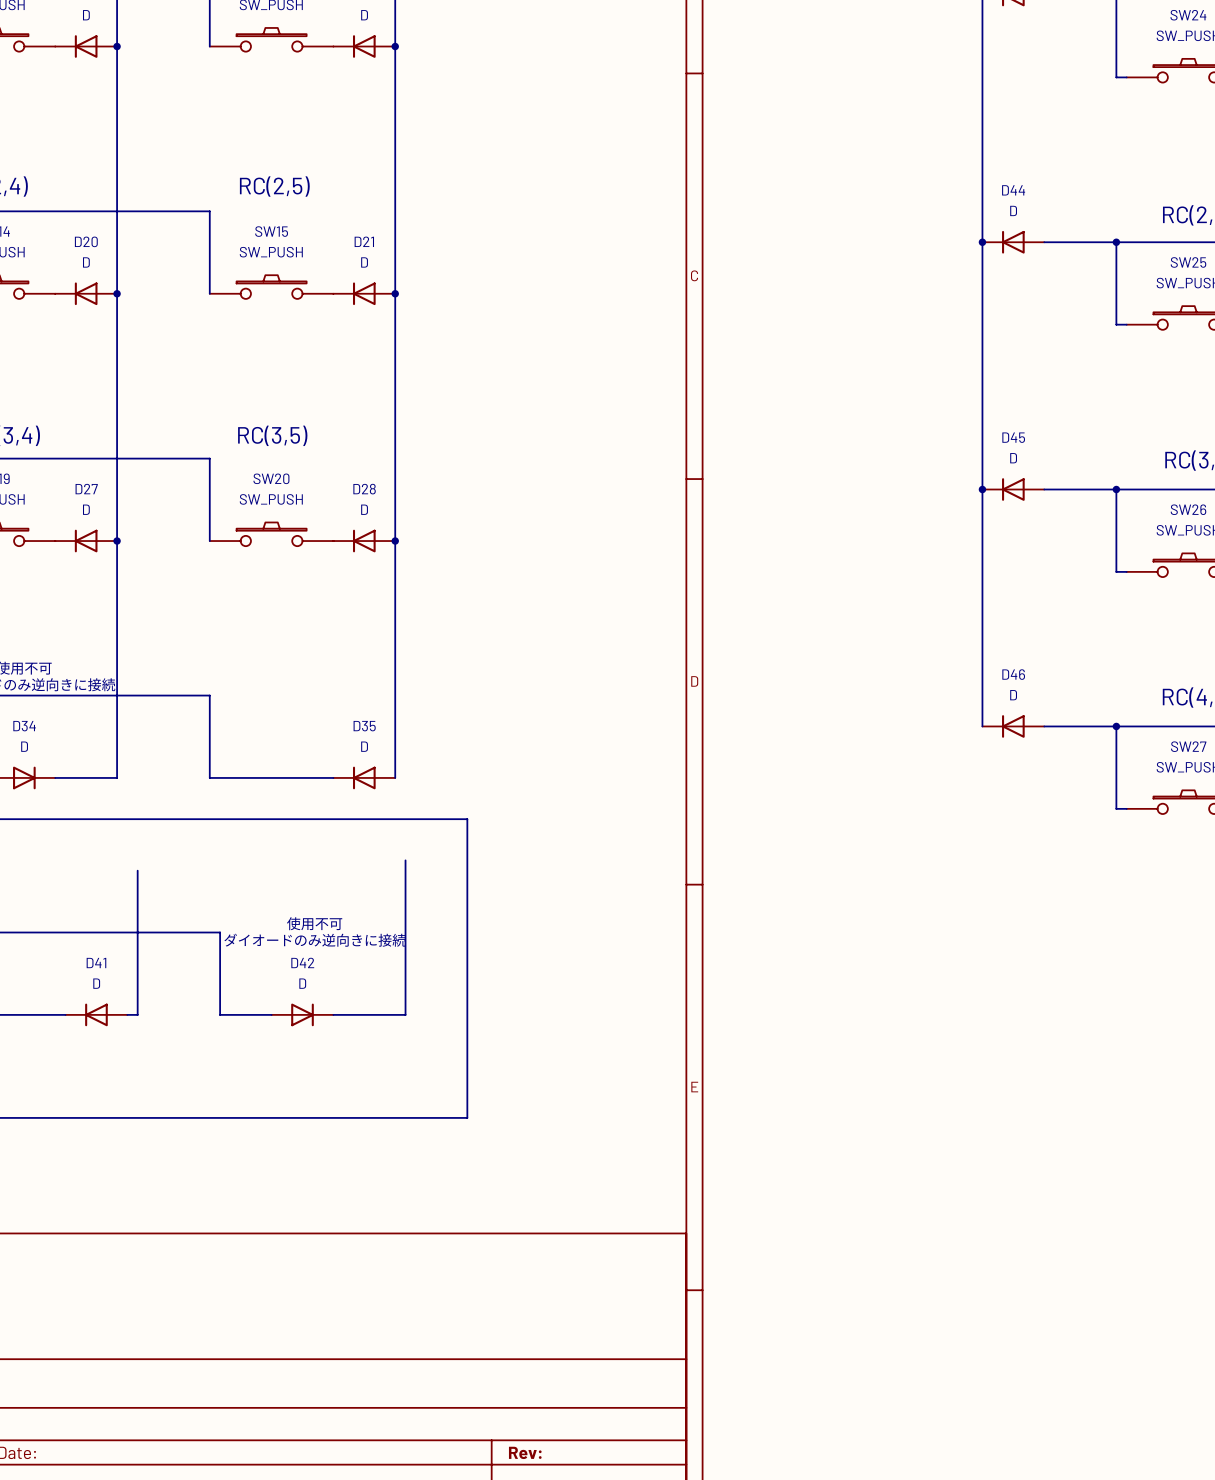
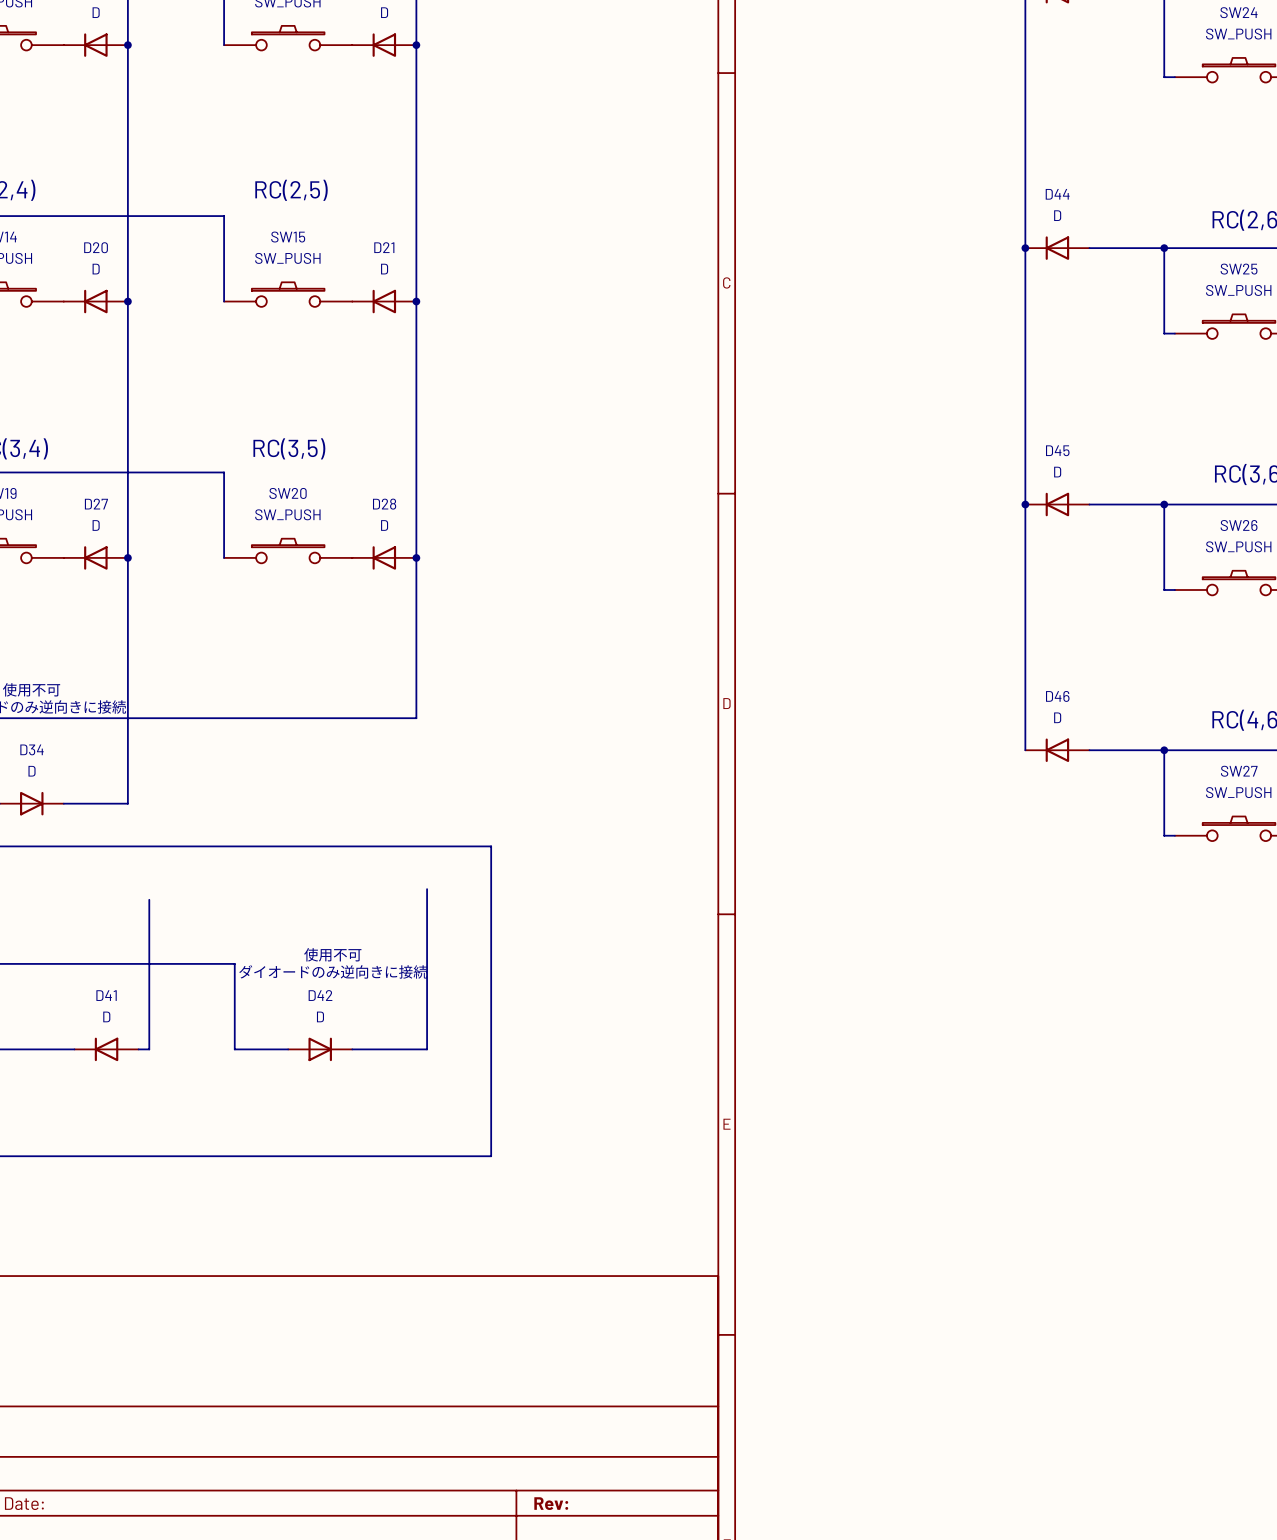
wire: (209, 695) (209, 777) (333, 777) -> (224, 718) (416, 718)
wire: (395, 695) (395, 777) -> none
D35: D (364, 777) -> none

